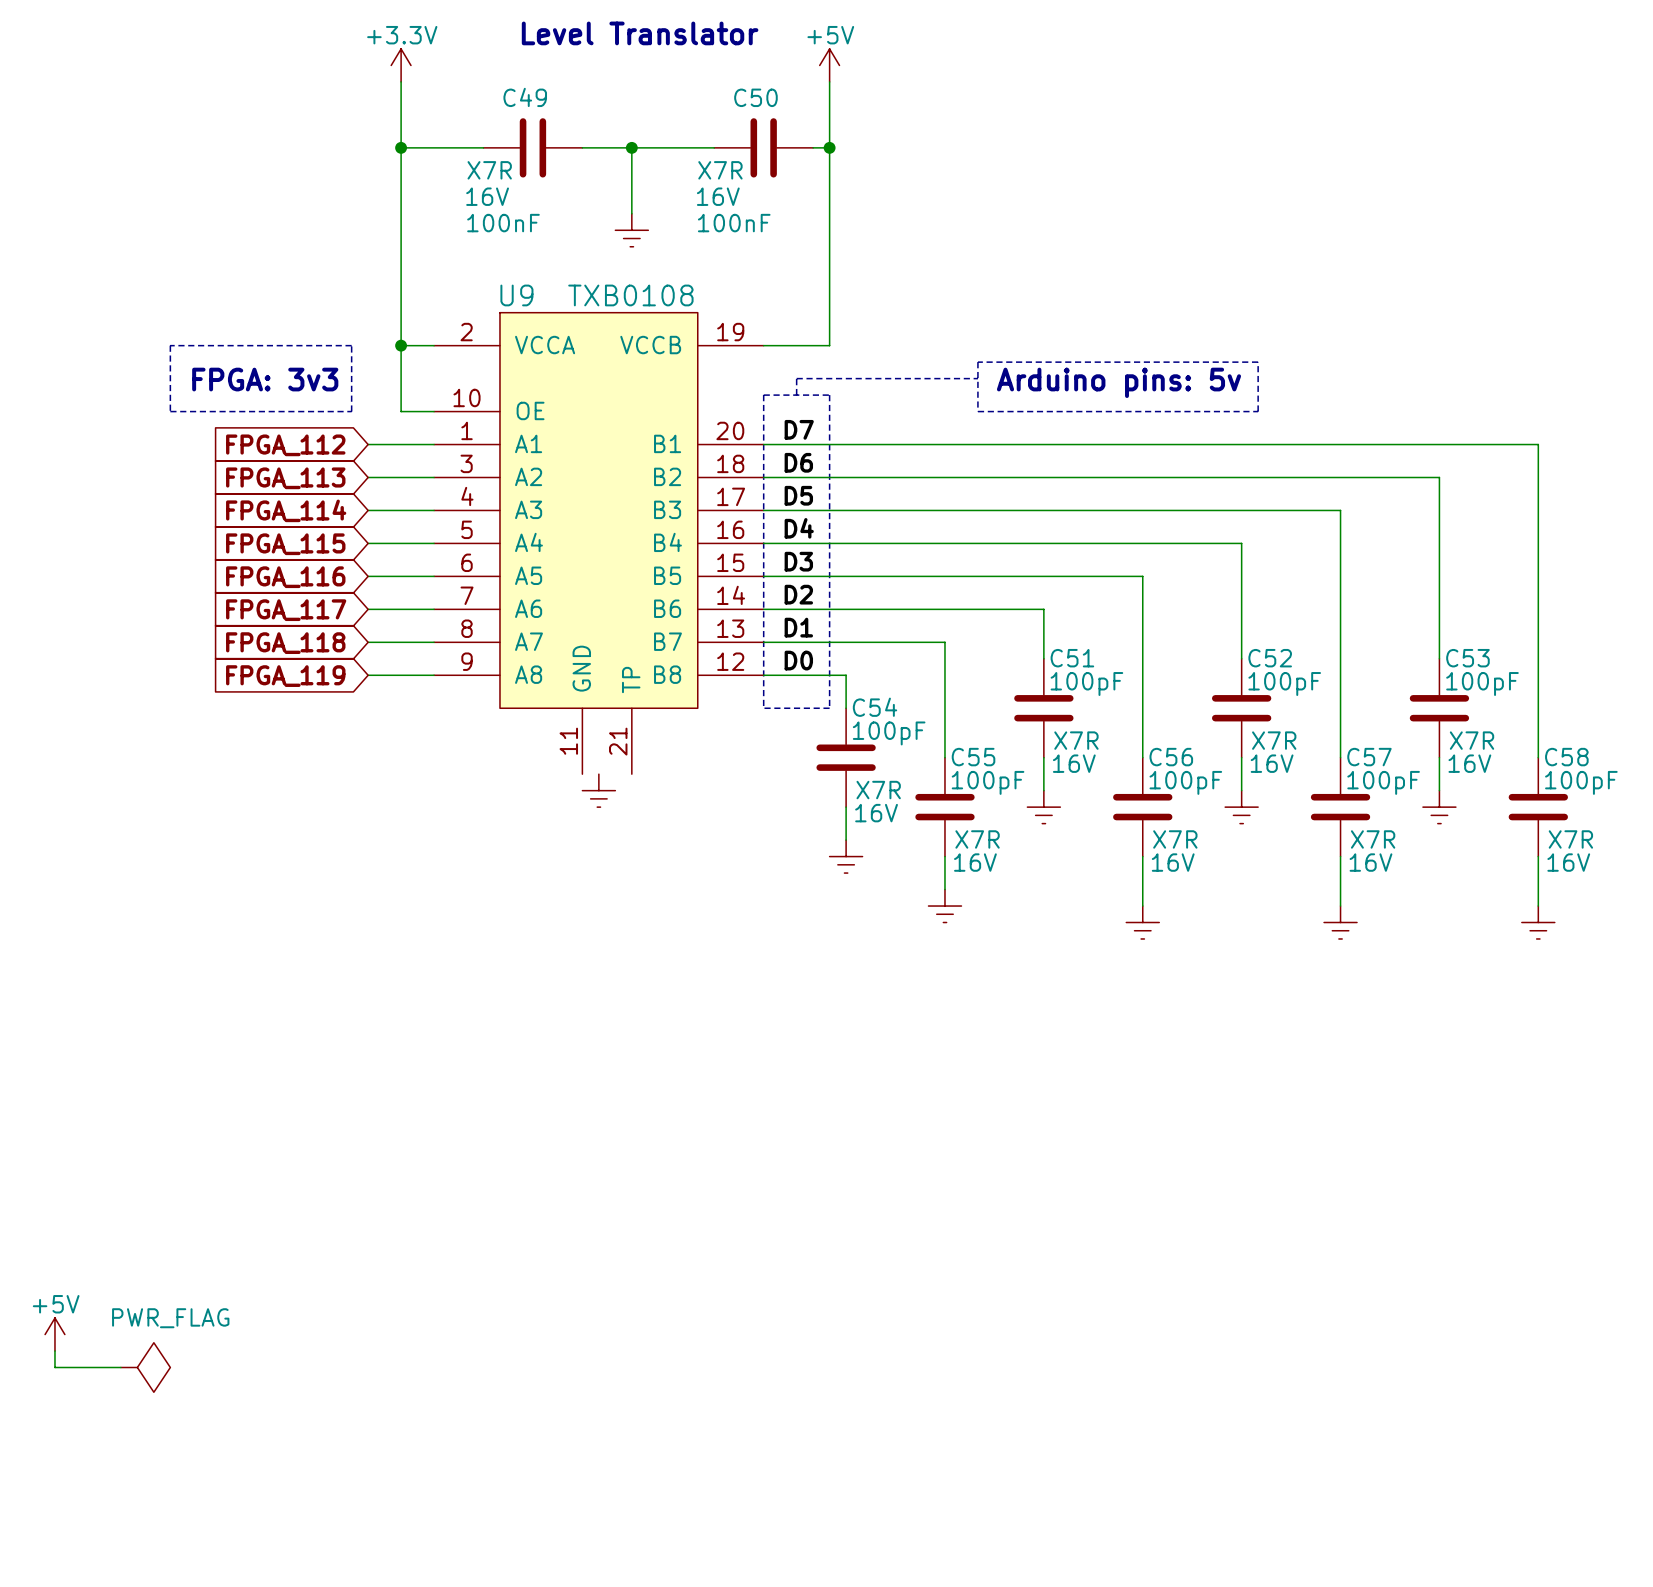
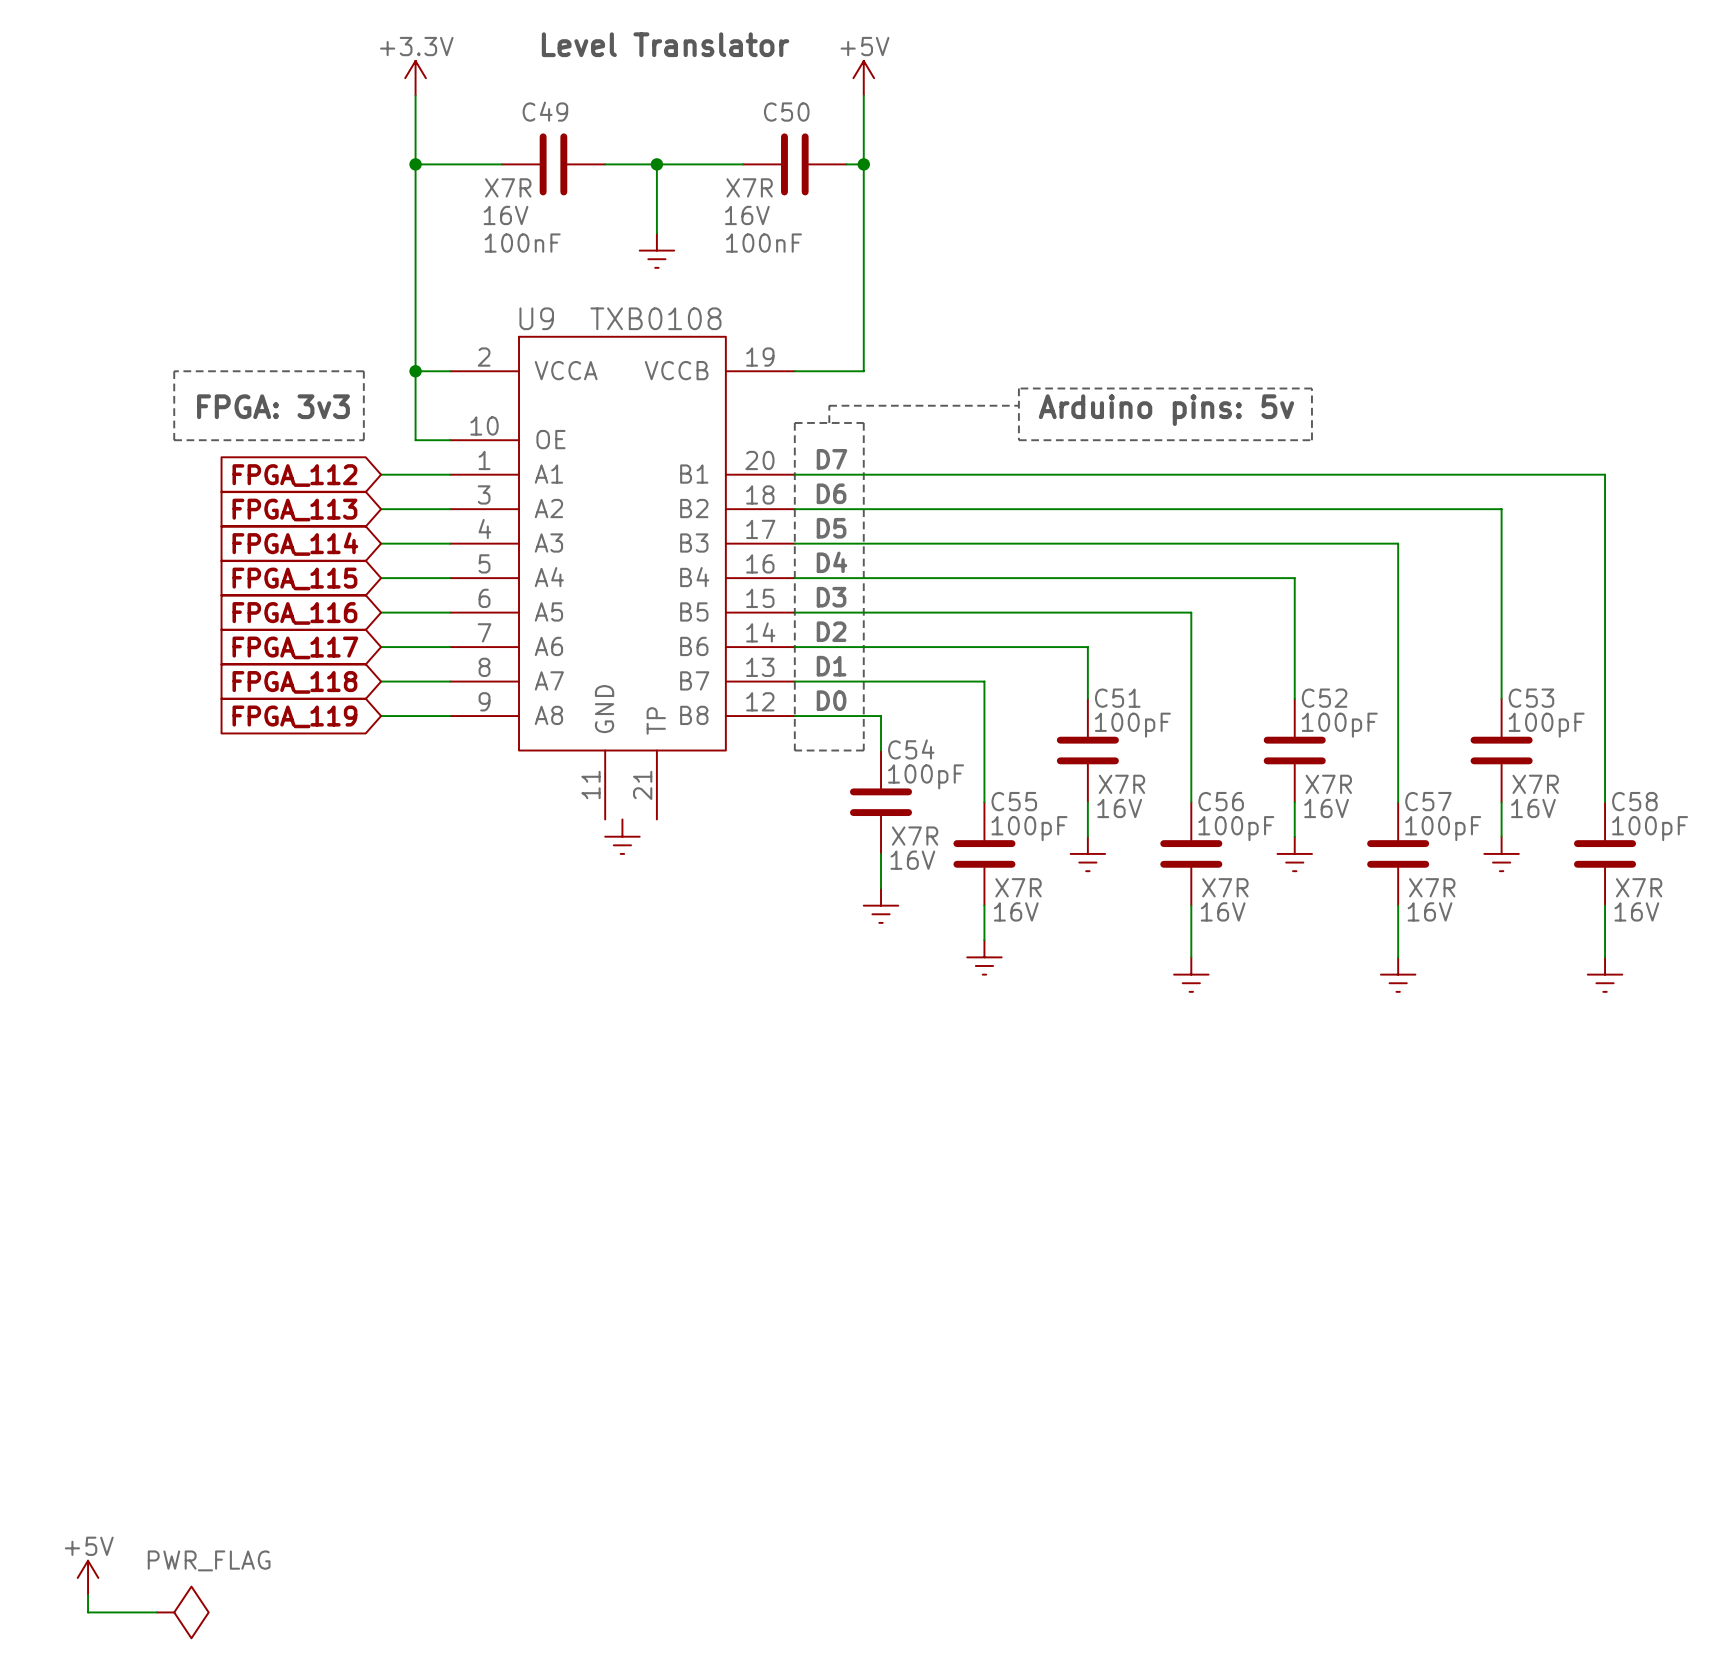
power symbol position: +5V (54, 1334) -> +5V (88, 1577)
wire: (54, 1351) (54, 1367) (120, 1367) -> (88, 1595) (88, 1612) (156, 1612)
power symbol position: PWR_FLAG (145, 1367) -> PWR_FLAG (182, 1612)

